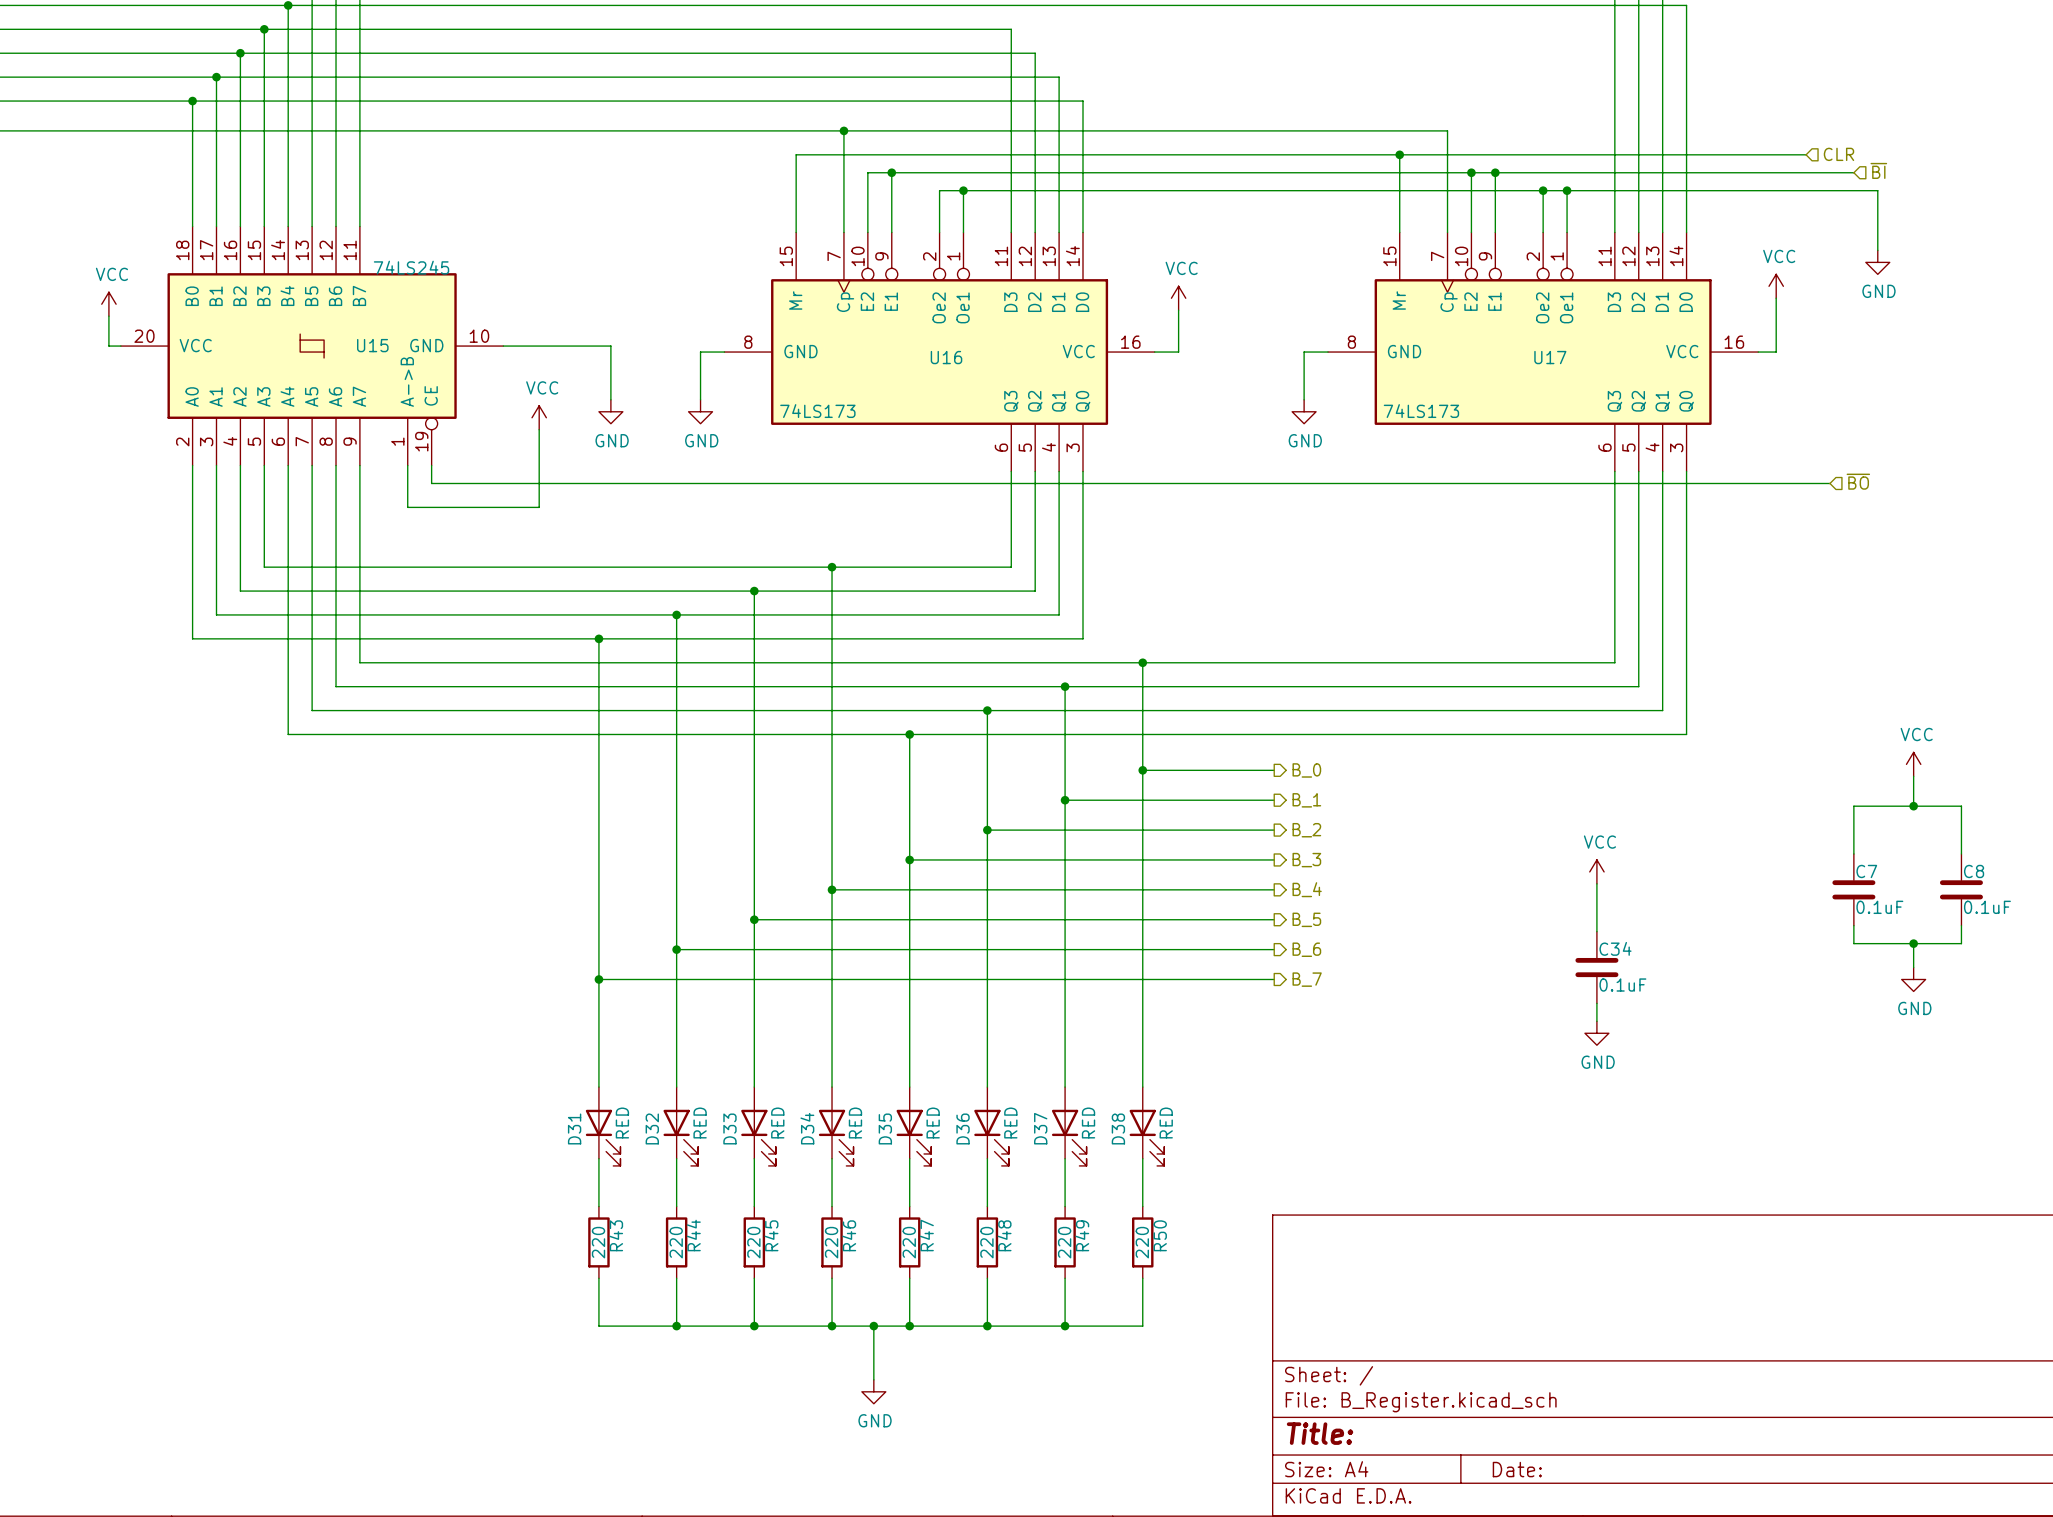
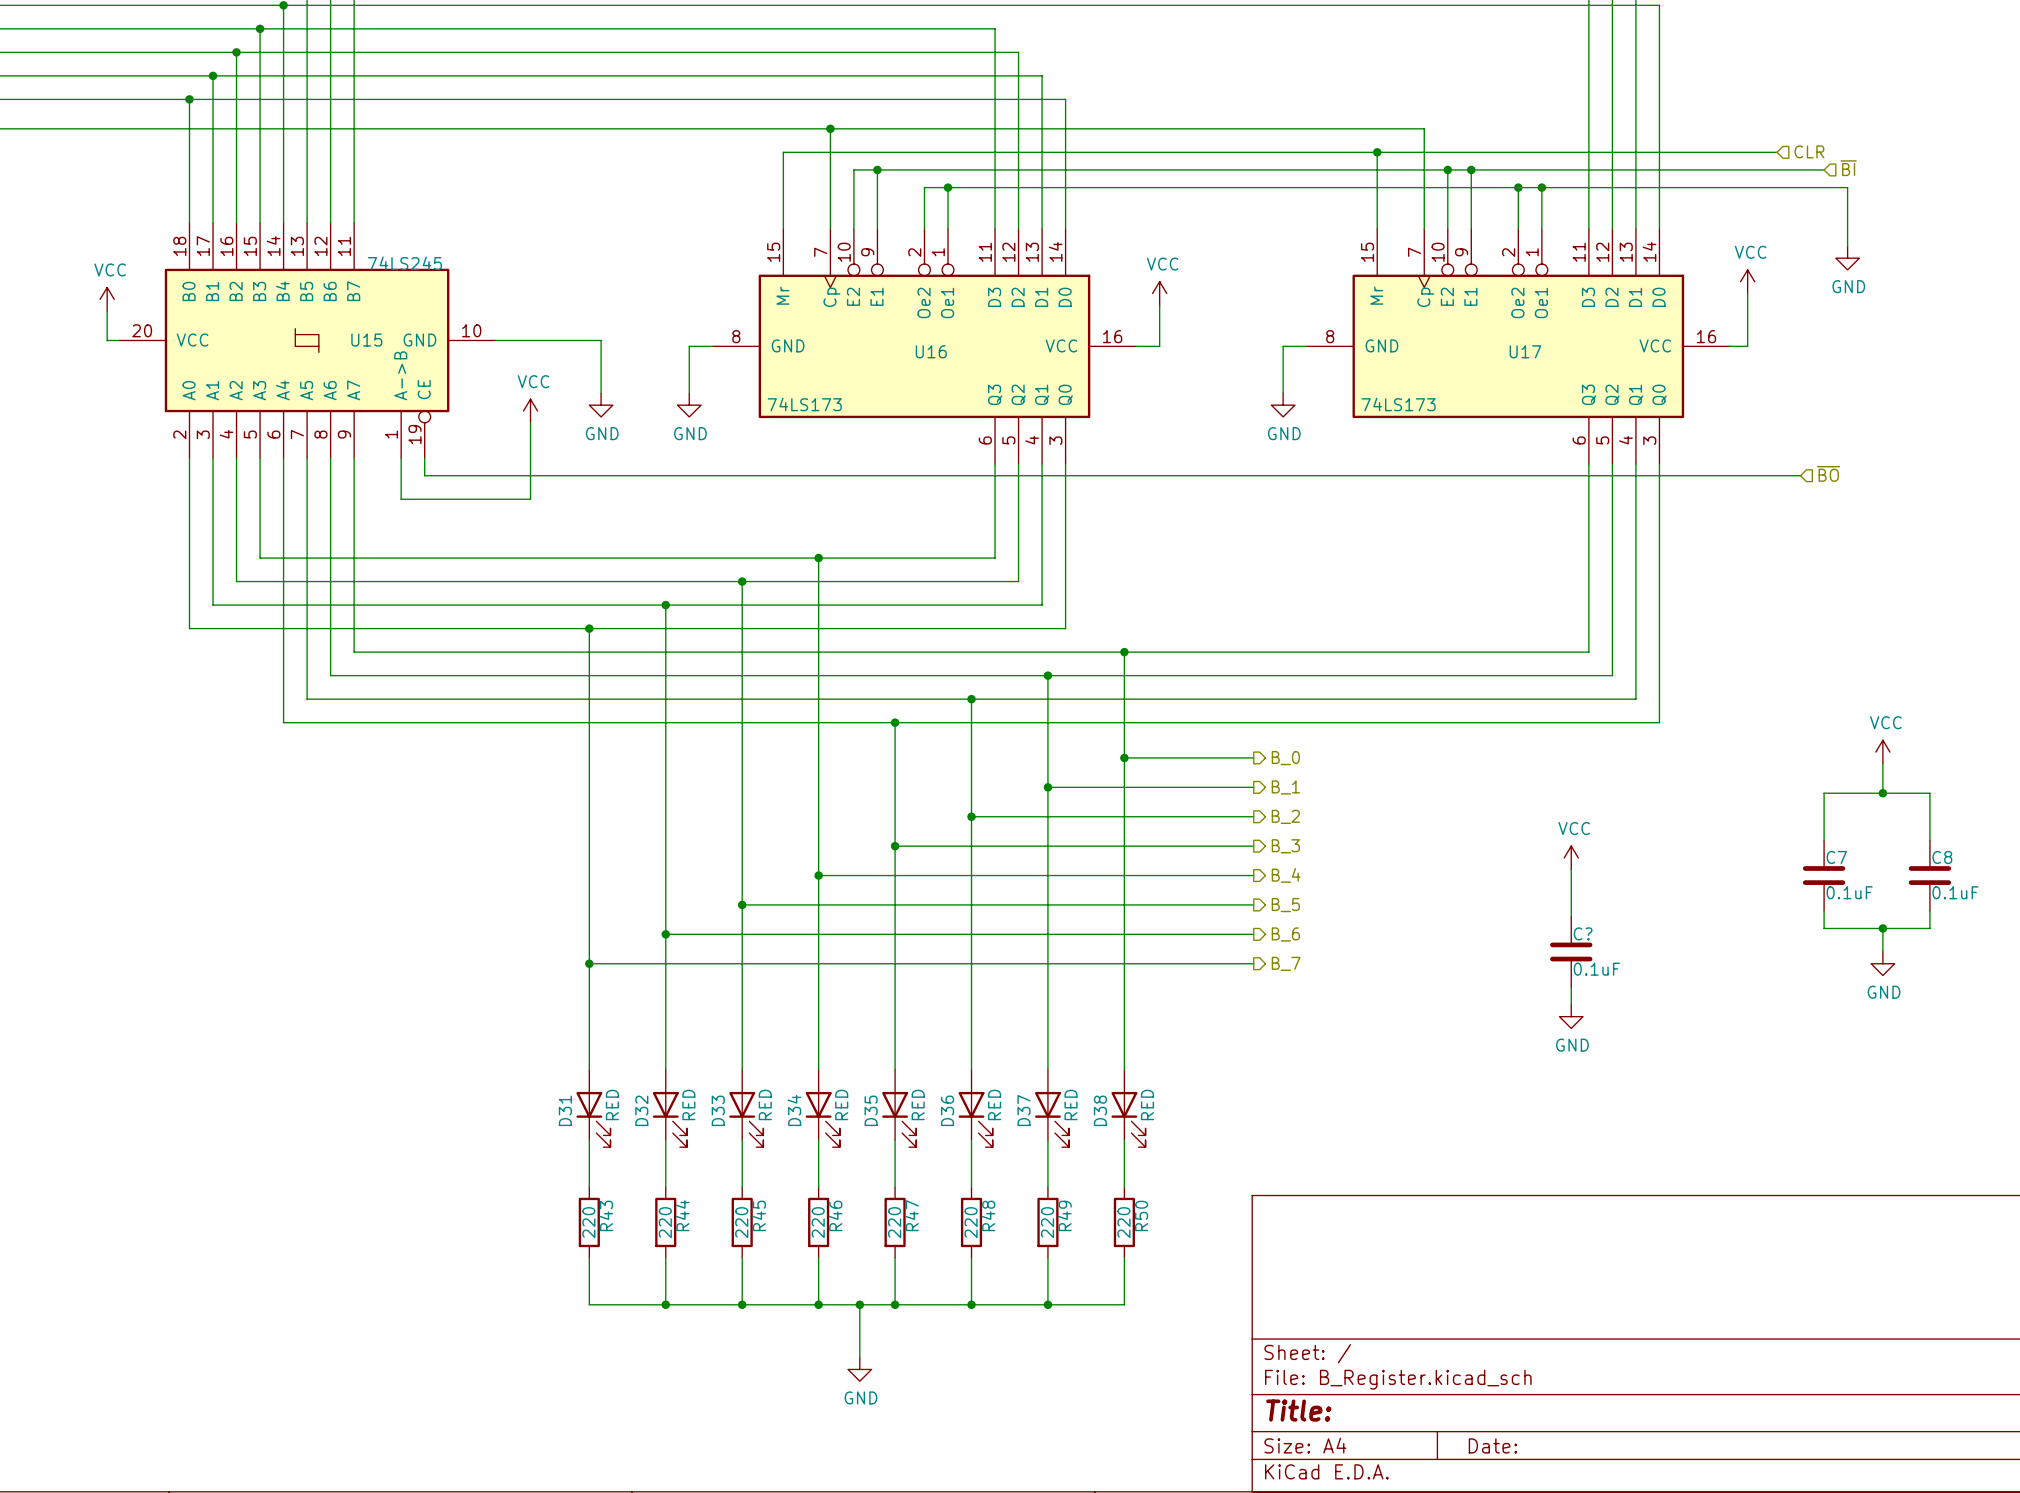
C34 name: C34 (1615, 948) -> C? (1583, 933)

